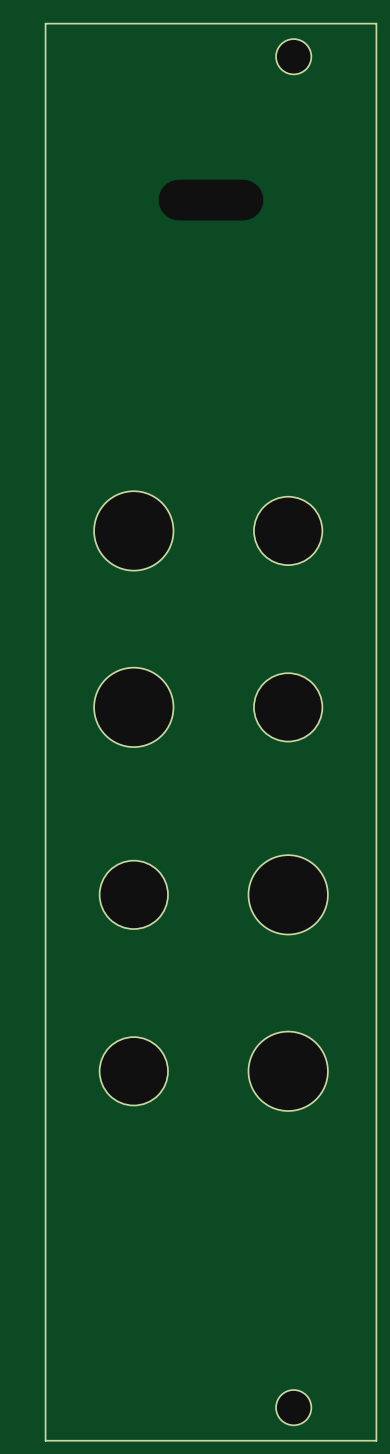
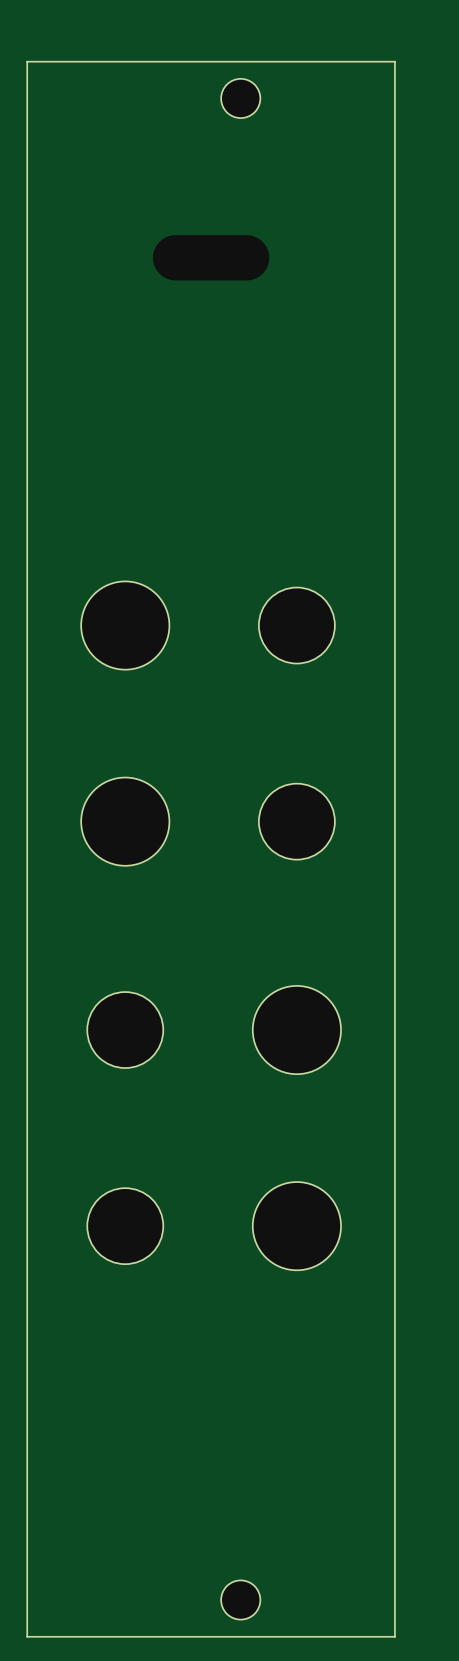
part position: (293, 56) -> (240, 98)
part position: (293, 1407) -> (240, 1600)

